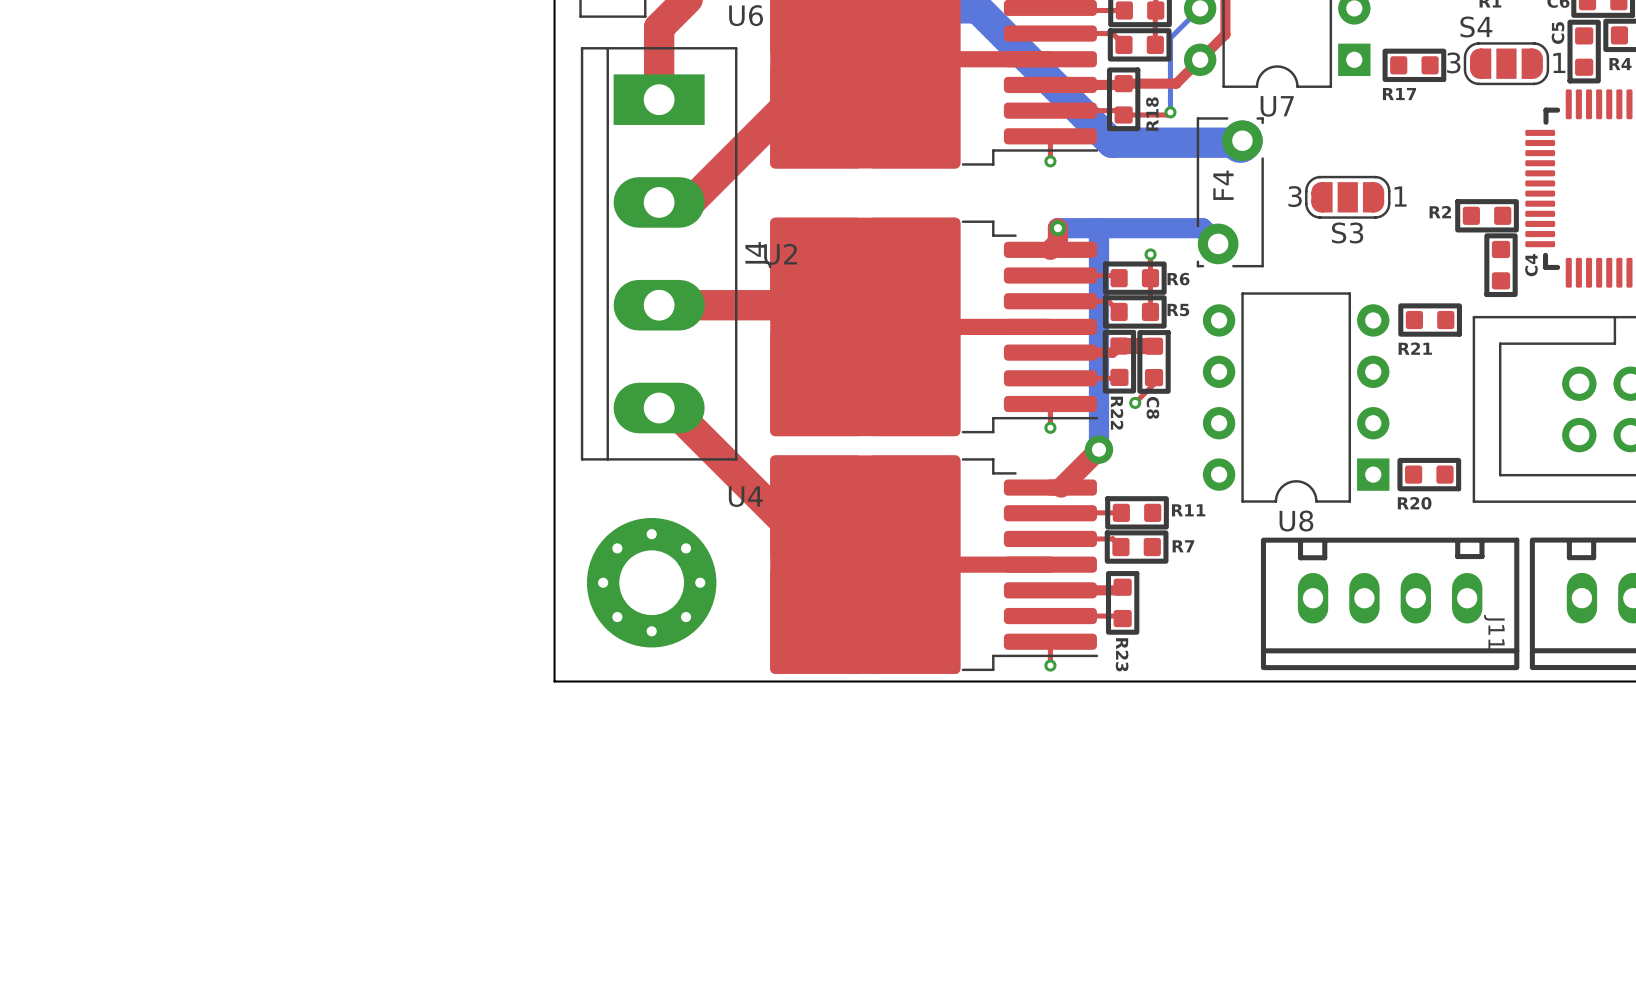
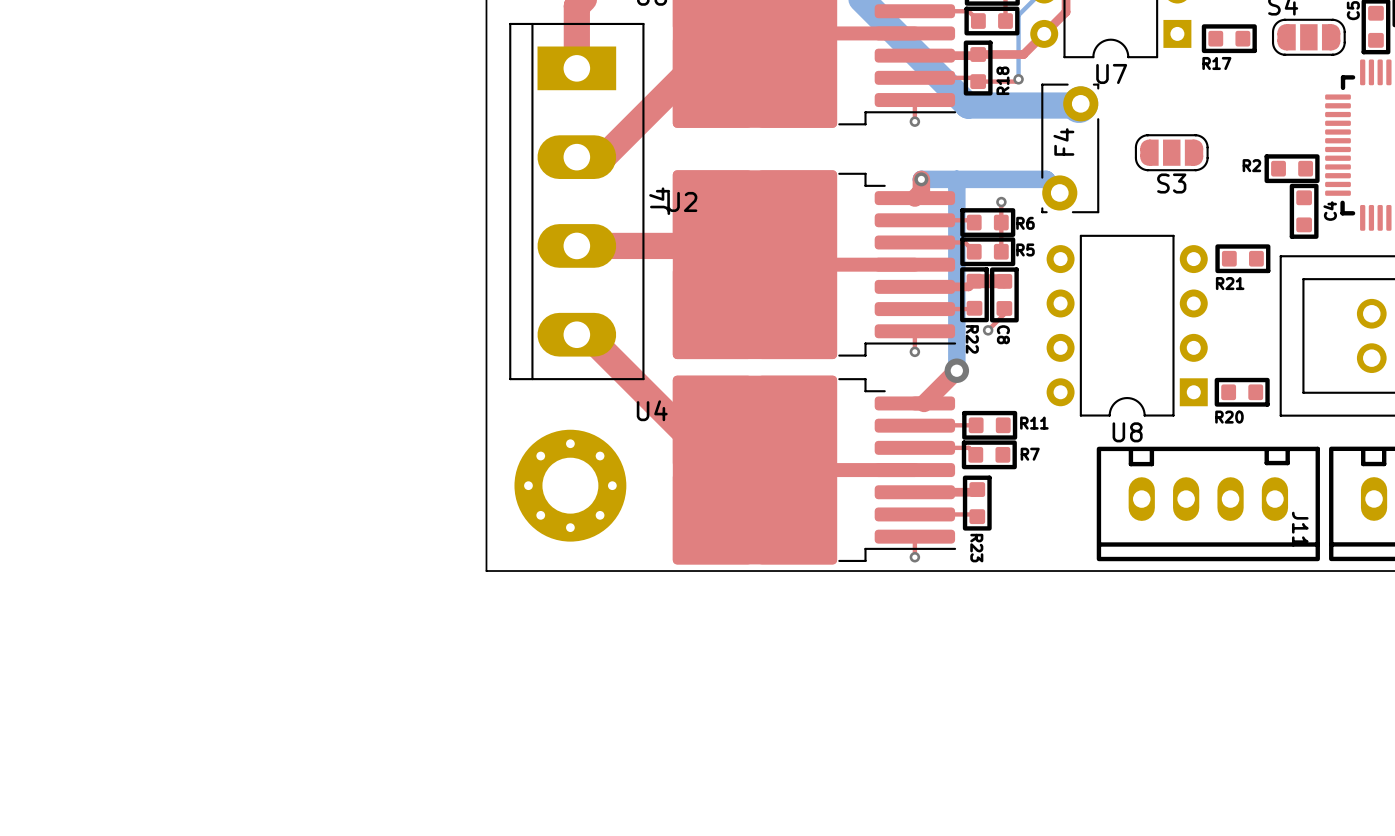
S4 text: 3 (1453, 62) -> none
S4 text: 1 (1559, 62) -> none
S3 text: 3 (1295, 196) -> none
S3 text: 1 (1400, 196) -> none

